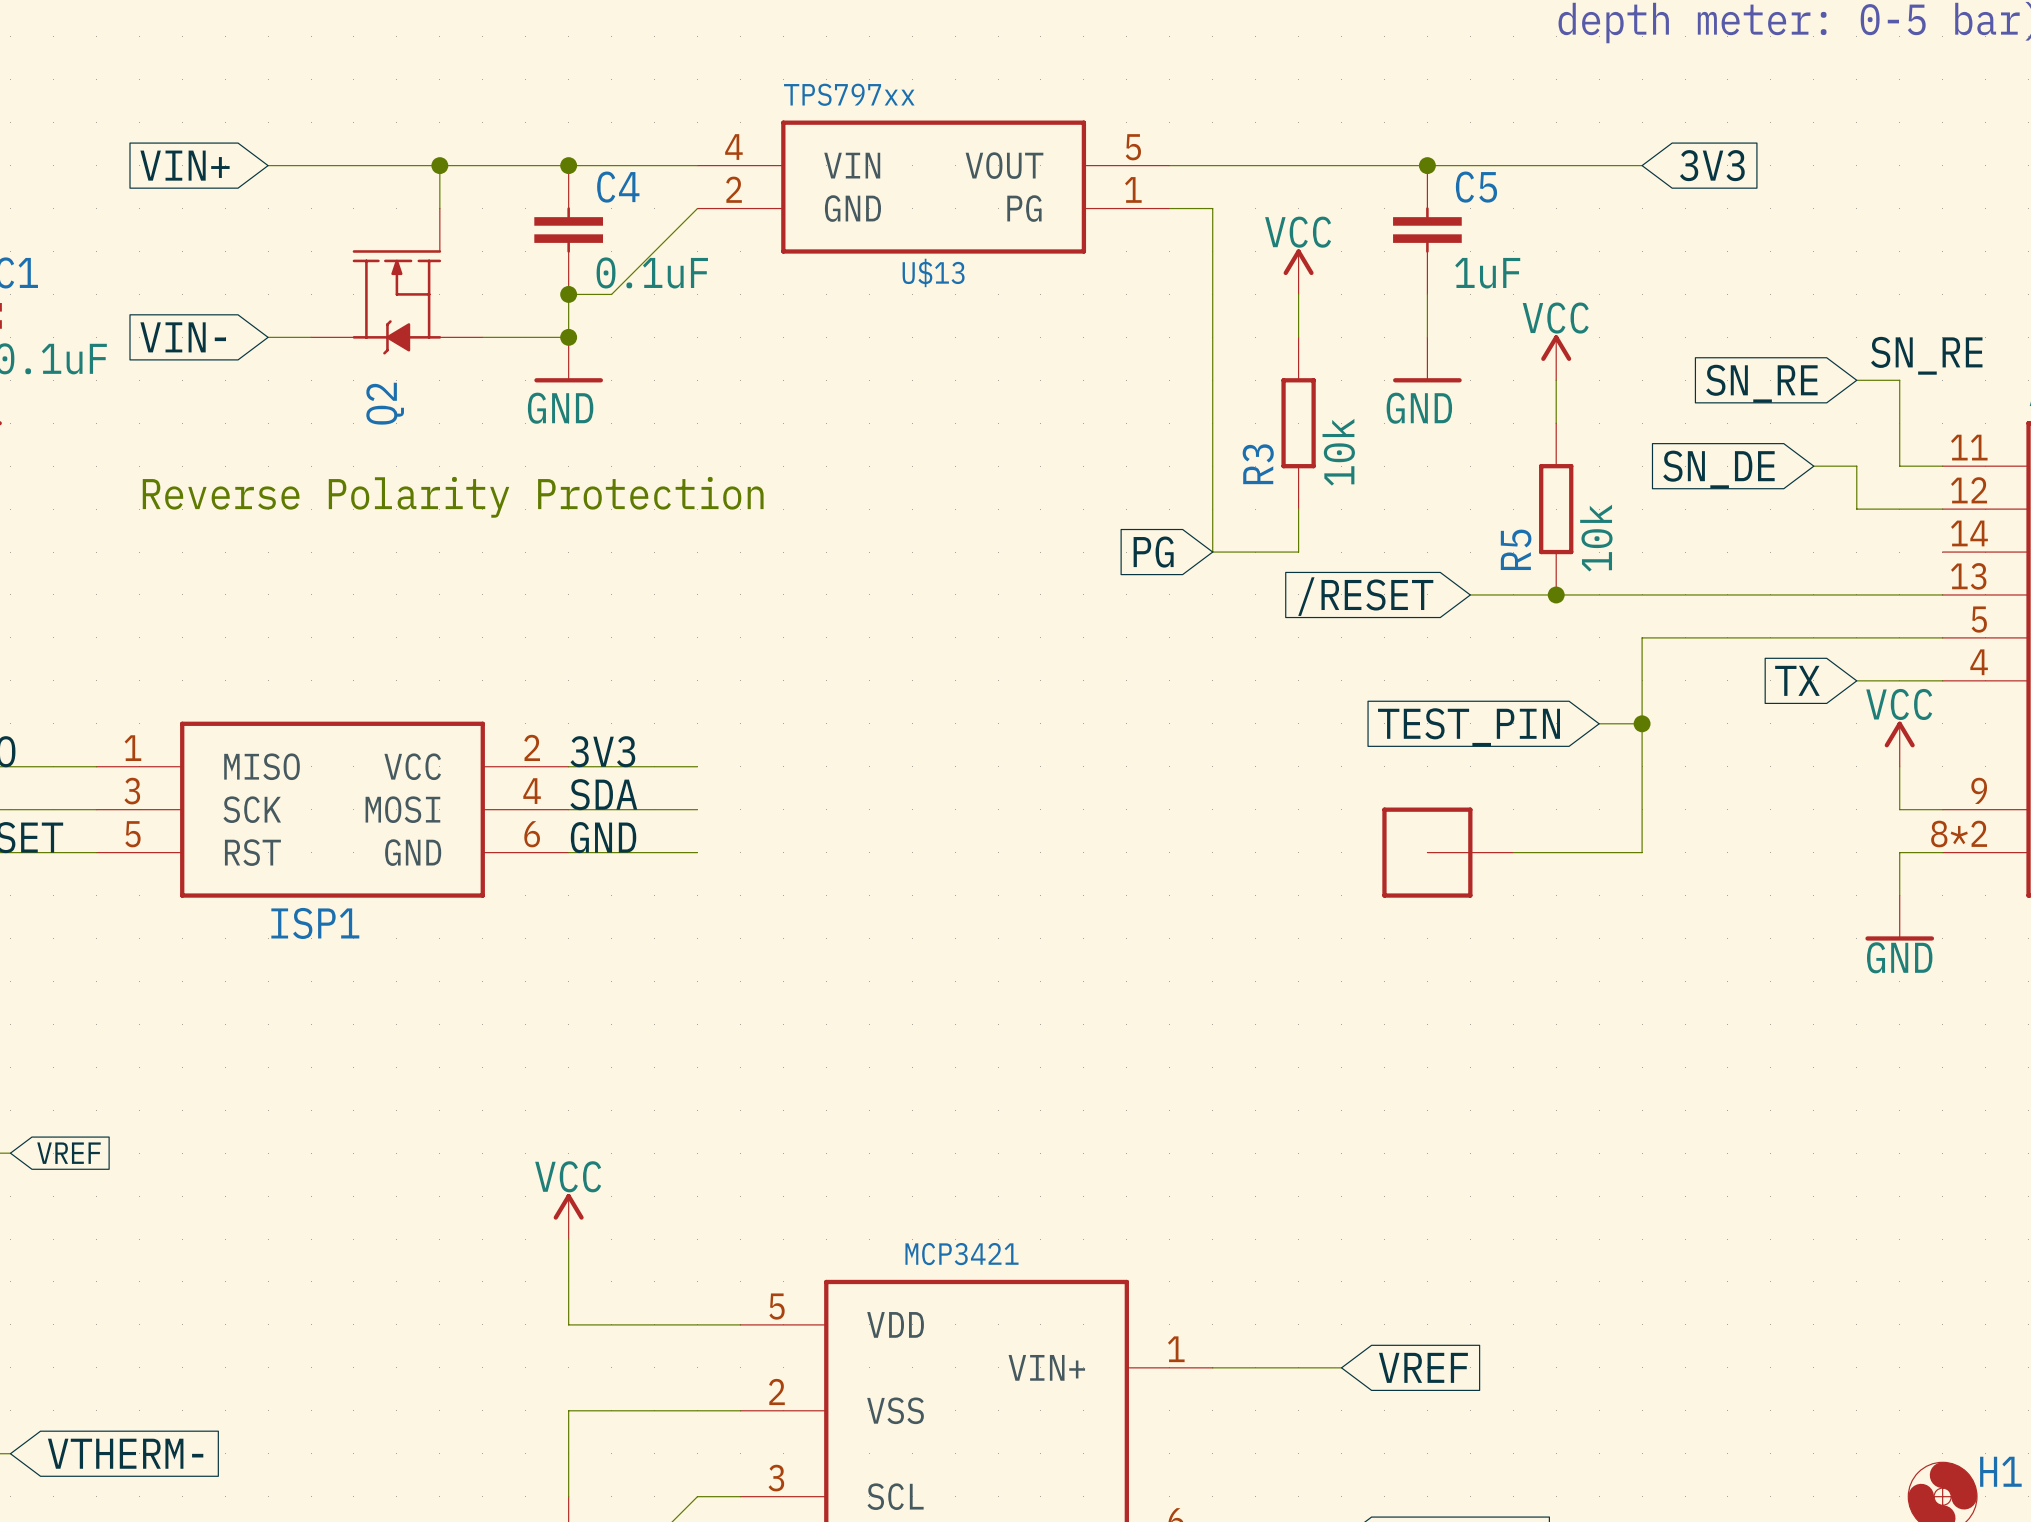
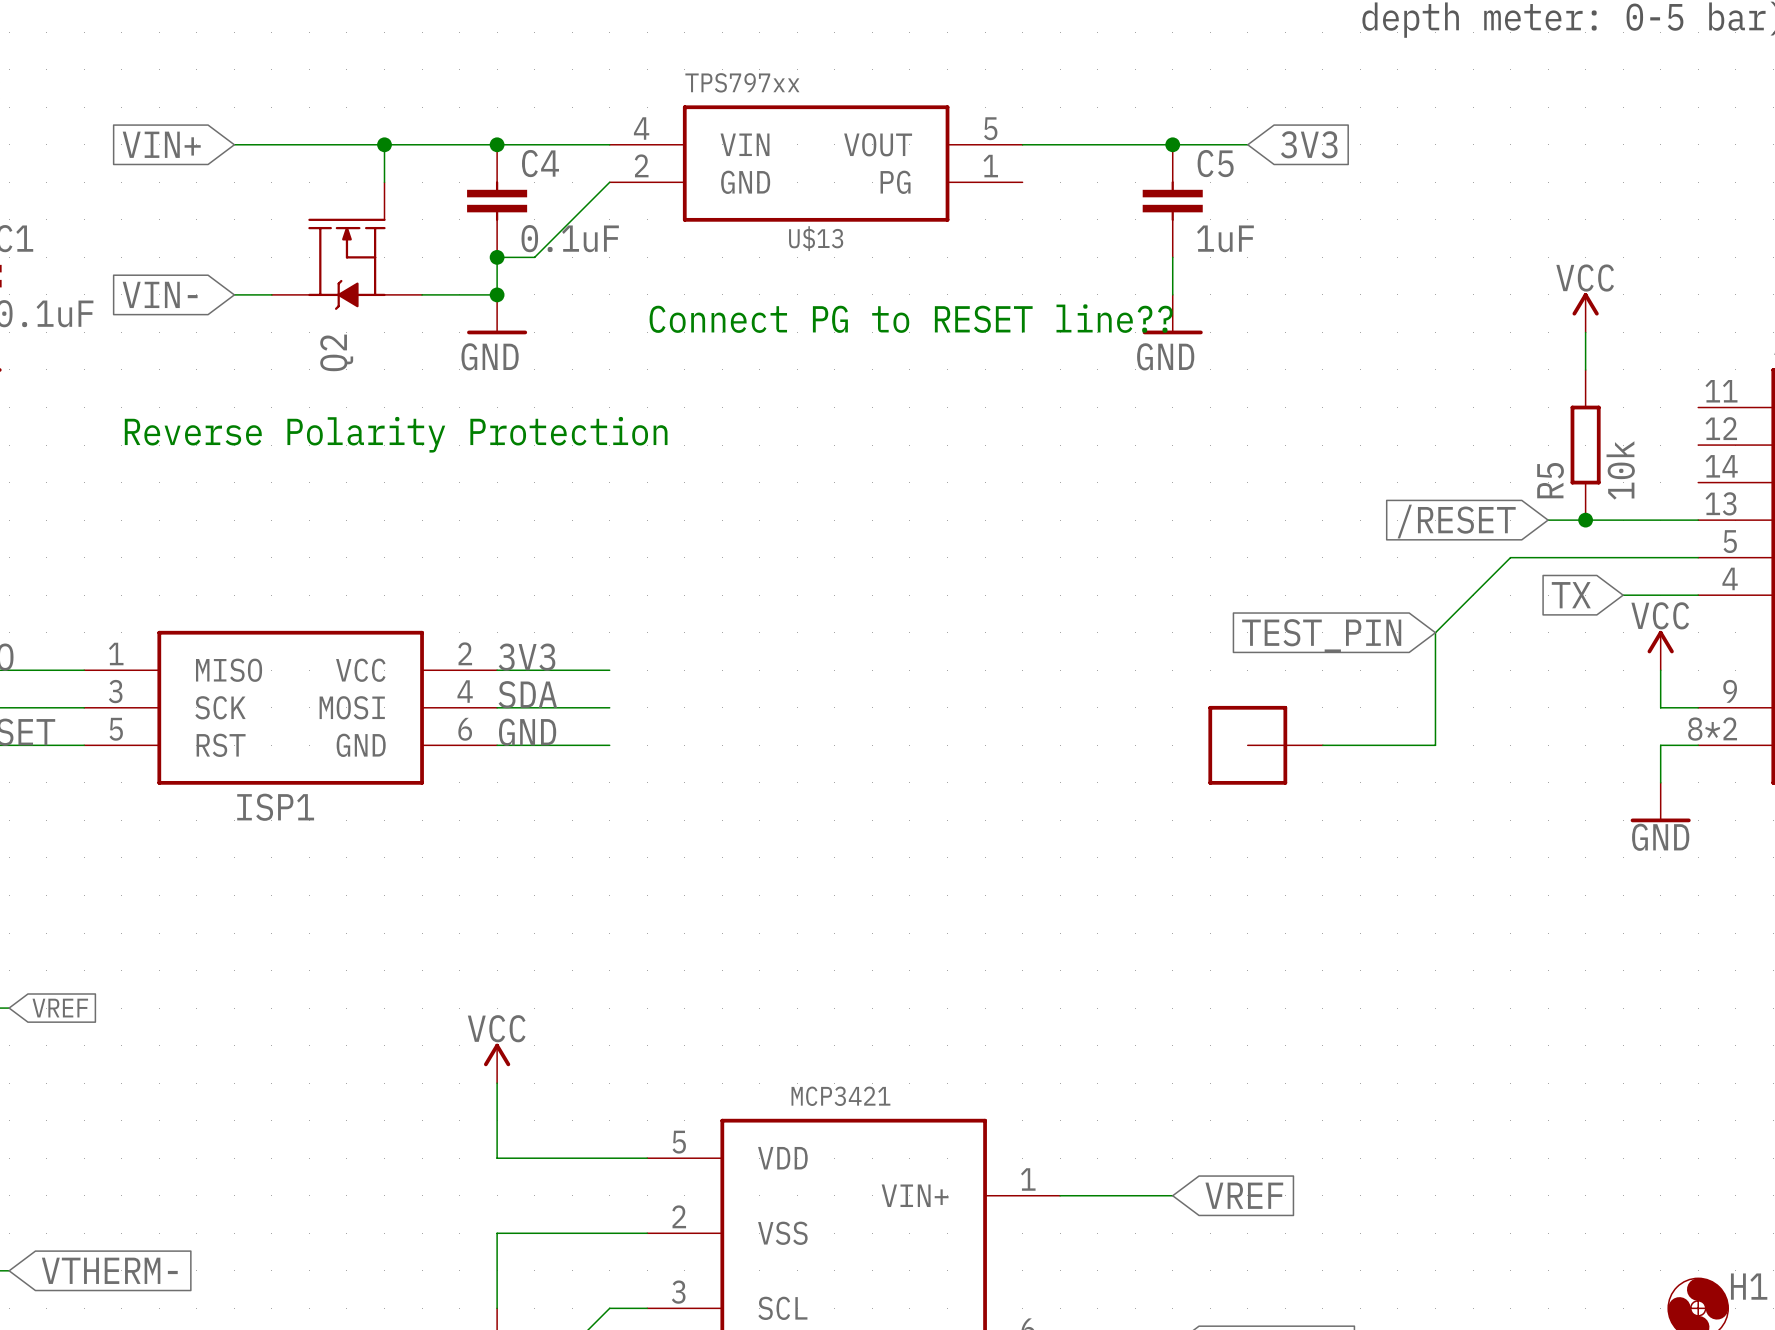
wire: (1427, 165) (1642, 165) -> none
junction position: (1427, 165) -> (1172, 144)
global label position: 3V3 (1712, 165) -> 3V3 (1309, 144)
wire: (1169, 208) (1212, 208) (1212, 552) (1298, 552) (1298, 509) -> none
C5 position: (1427, 230) -> (1172, 201)
power symbol: VCC (1298, 271) -> none
wire: (1298, 294) (1298, 337) -> (1172, 257) (1172, 294)
wire: (1427, 294) (1427, 337) -> none
label: SN_RE (1926, 355) -> none
power symbol position: VCC (1556, 357) -> VCC (1585, 312)
power symbol position: GND (1427, 359) -> GND (1172, 314)
text: none -> Connect PG to RESET line?? (911, 318)
wire: (1556, 380) (1556, 423) -> (1585, 332) (1585, 369)
wire: (1856, 380) (1899, 380) (1899, 466) (1942, 466) -> none
global label: SN_RE (1761, 383) -> none
R3: 10k (1298, 423) -> none
wire: (1813, 466) (1856, 466) (1856, 509) (1942, 509) -> none
global label: SN_DE (1718, 469) -> none
R5 position: (1556, 509) -> (1585, 445)
global label: PG (1153, 552) -> none
wire: (1470, 594) (1770, 594) -> none
junction: (1556, 594) -> none
junction: none -> (1585, 520)
global label position: /RESET (1365, 596) -> /RESET (1456, 521)
wire: (1727, 637) (1642, 637) (1642, 723) (1599, 723) -> (1510, 557) (1435, 632)
junction: (1642, 723) -> none
global label position: TEST_PIN (1469, 727) -> TEST_PIN (1321, 635)

